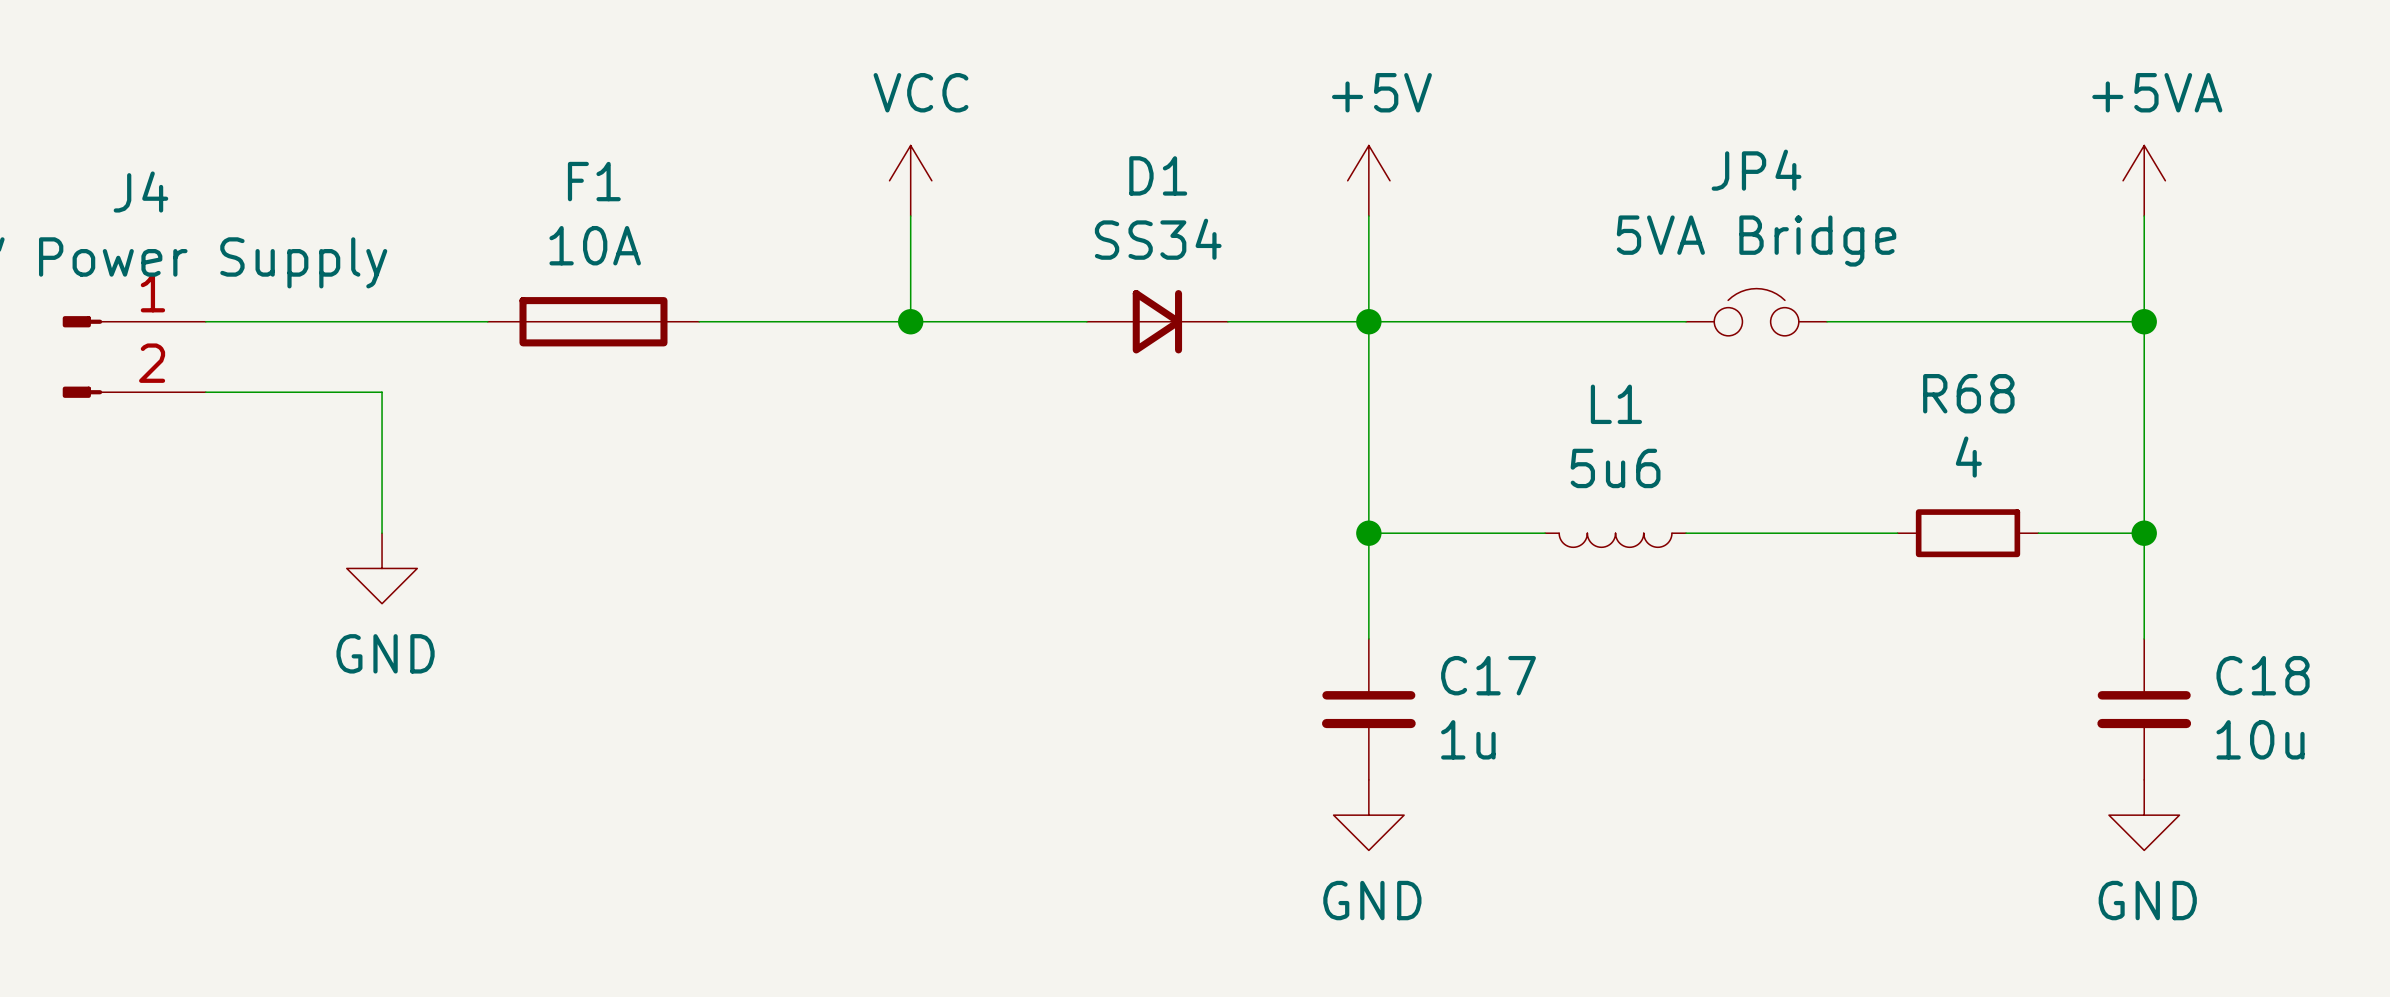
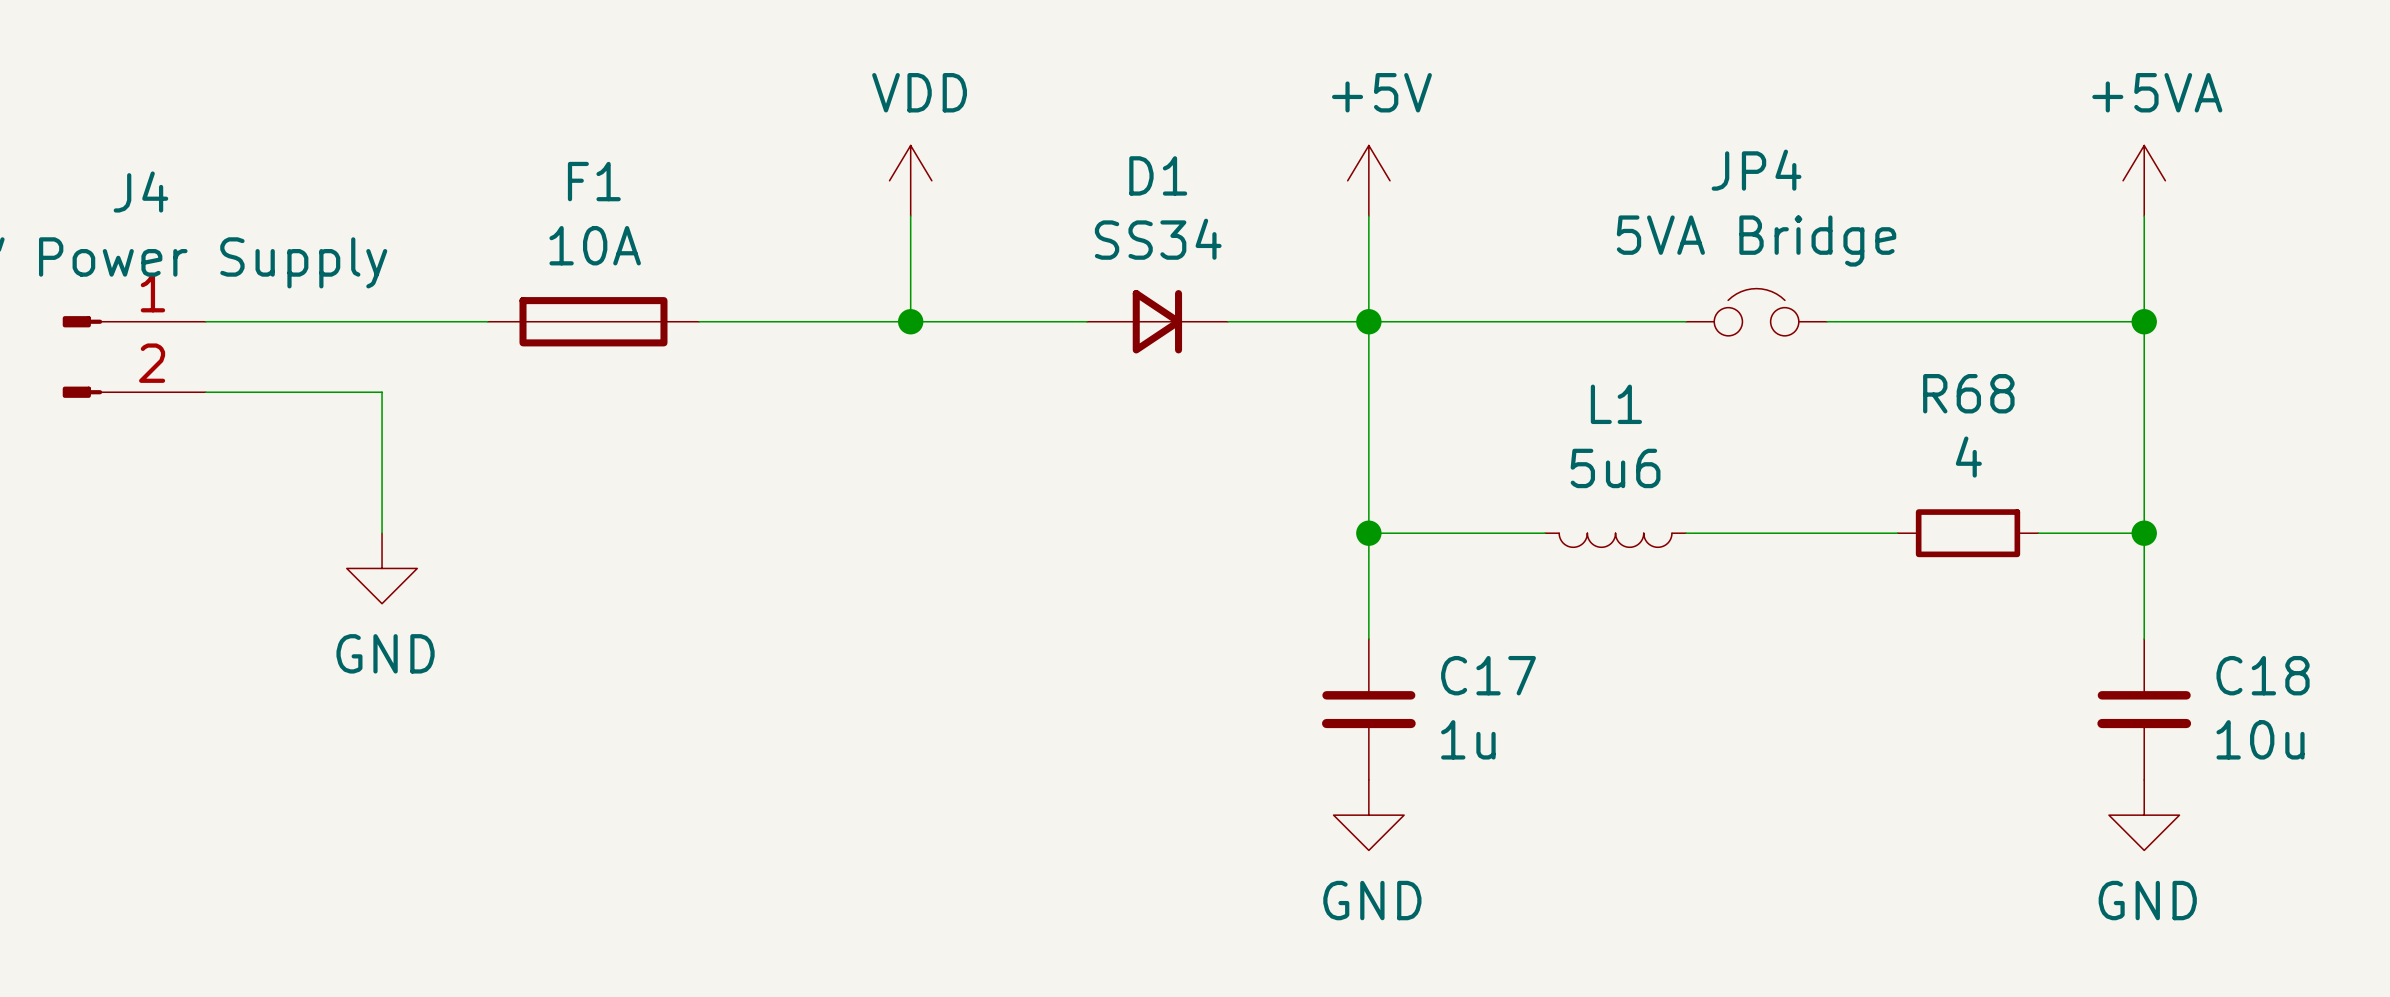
power symbol: VCC (910, 180) -> VDD (910, 180)

